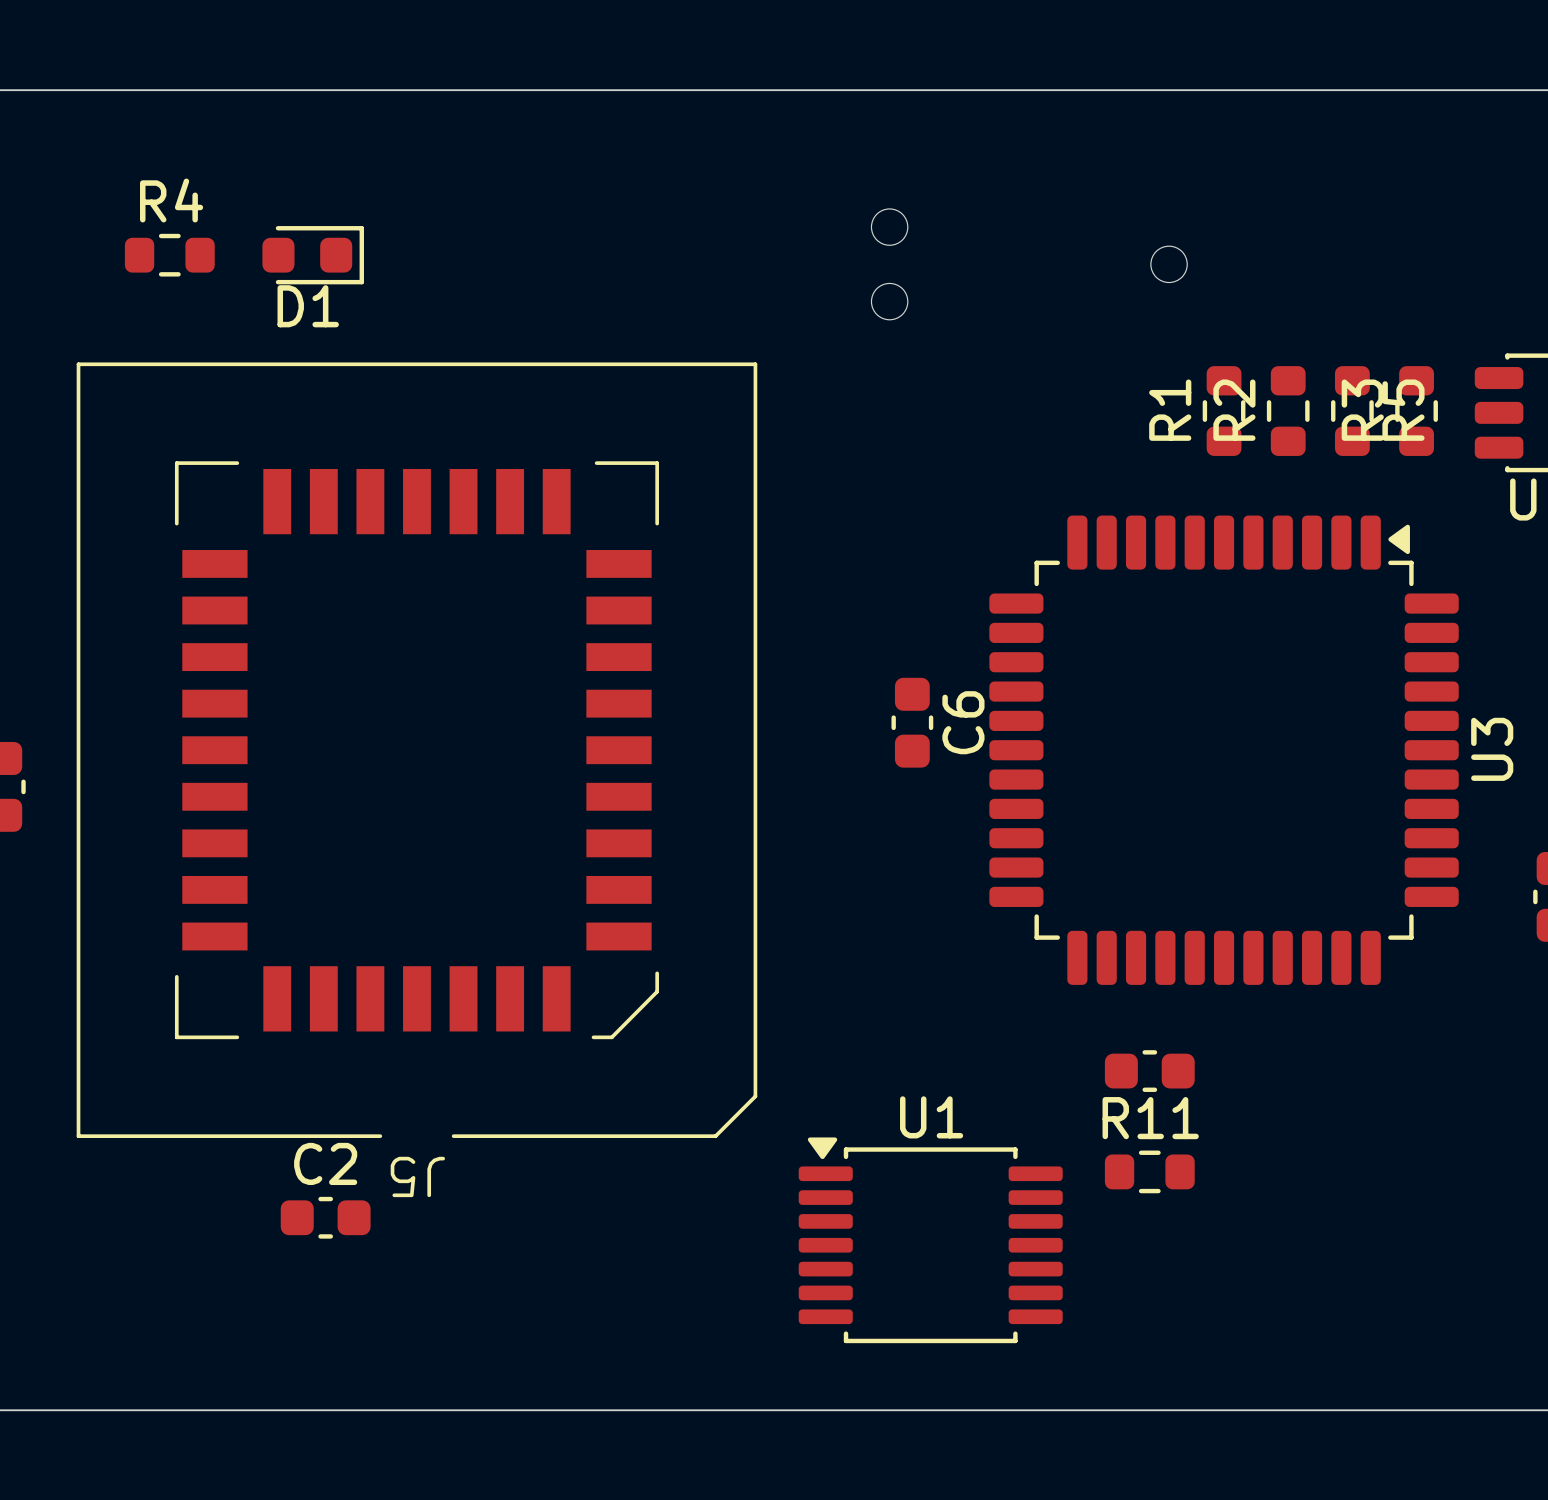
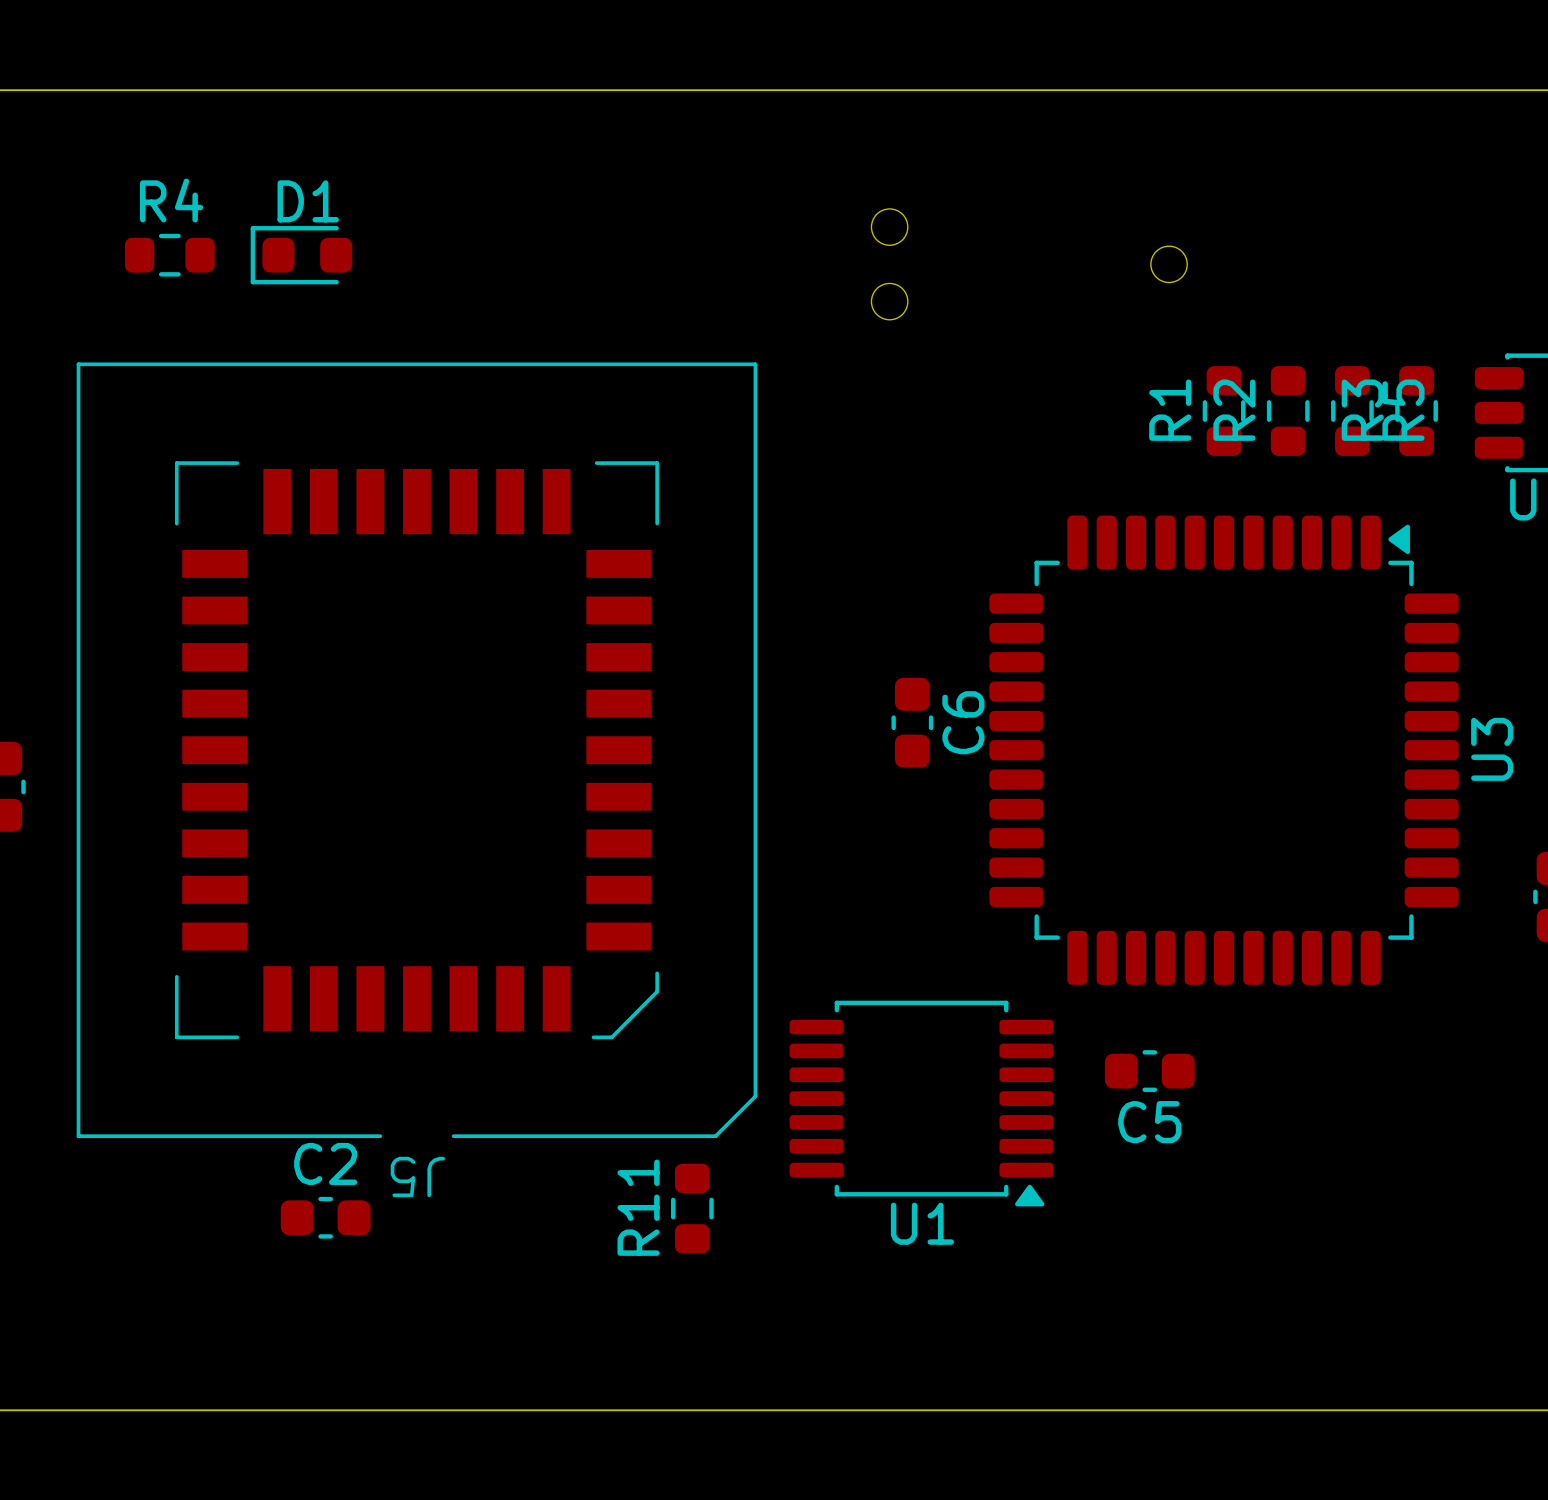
D1 rotation: 0° (313, 255) -> 180° (301, 255)
R11 name position: R11 (1150, 1118) -> R11 (638, 1207)
C5 name: none -> C5 (1149, 1122)
R11 rotation: 0° (1149, 1171) -> 90° clockwise (692, 1208)
R11 position: (1149, 1171) -> (692, 1208)
U1 rotation: 0° (930, 1240) -> 180° (921, 1103)

